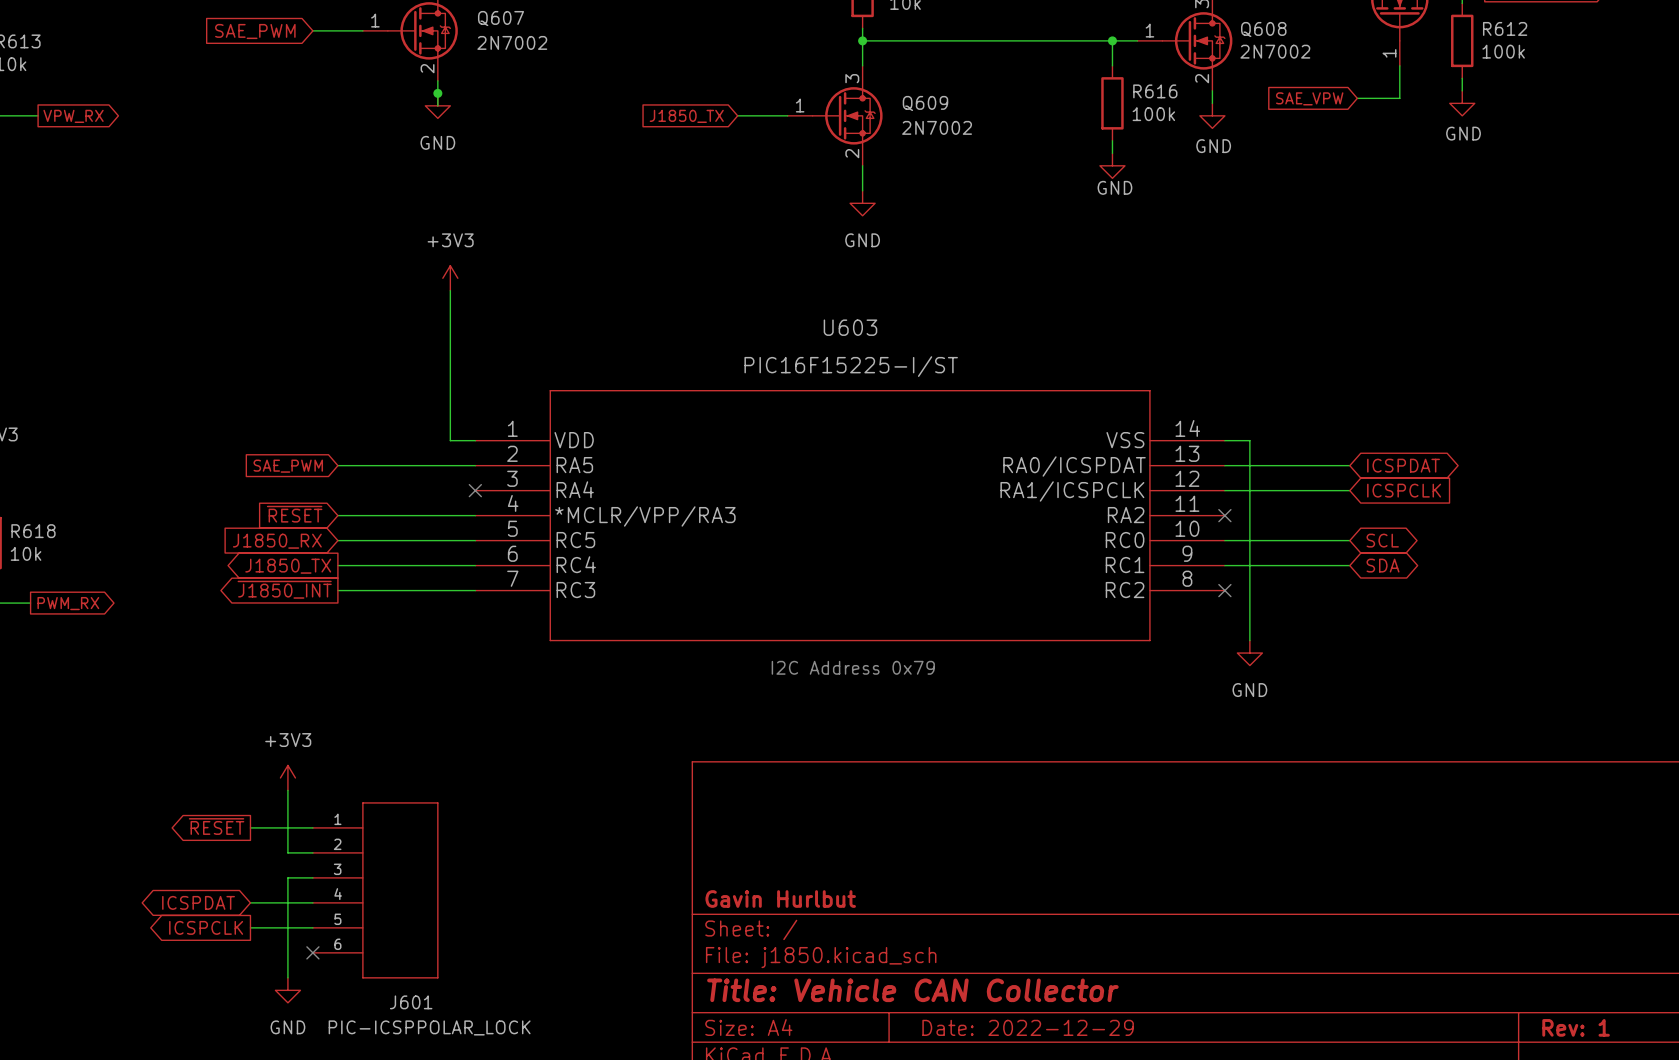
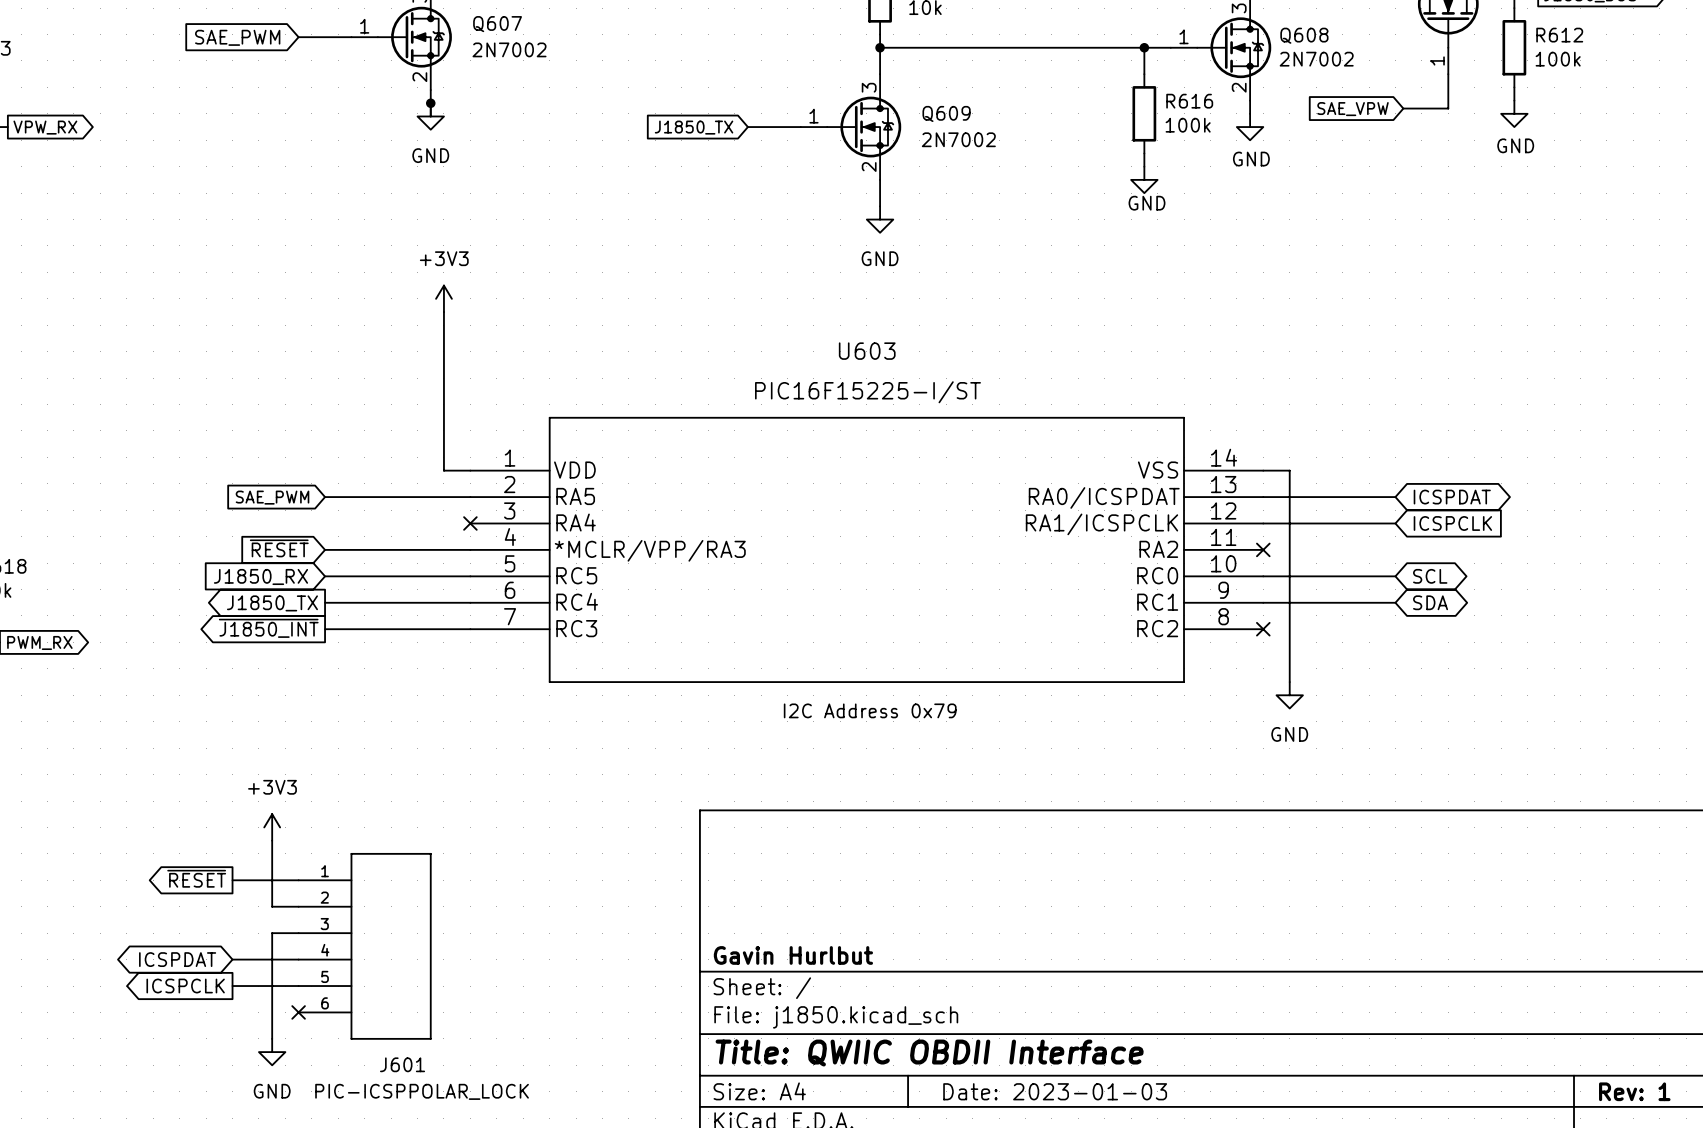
title block: Title: Vehicle CAN Collector (912, 990) -> Title: QWIIC OBDII Interface (929, 1053)
title block: Date: 2022-12-29 (1028, 1027) -> Date: 2023-01-03 (1055, 1091)

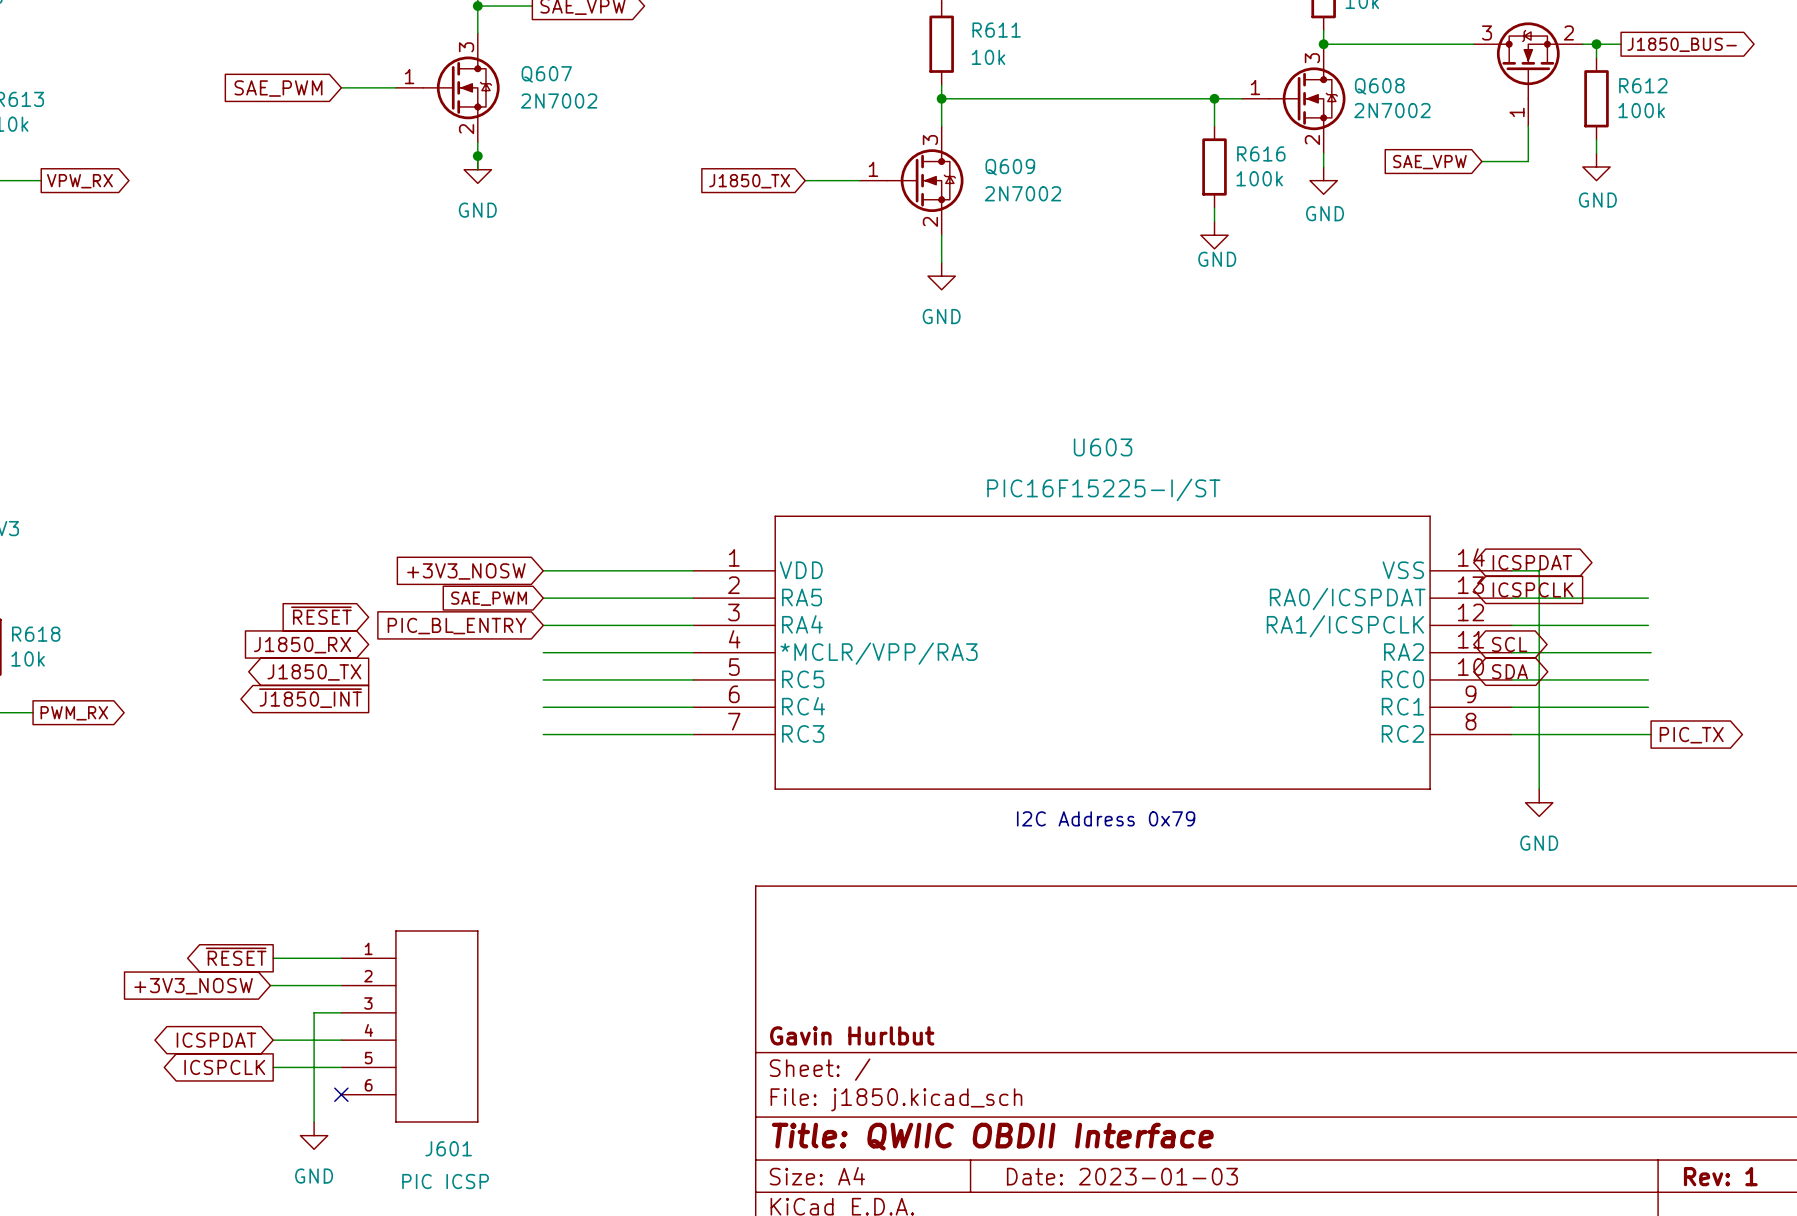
power symbol: +3V3 (443, 298) -> none
wire: (443, 312) (443, 470) (470, 470) -> none
wire: (1263, 470) (1289, 470) (1289, 682) -> (1511, 570) (1539, 570) (1539, 789)
global label position: SAE_PWM (272, 497) -> SAE_PWM (489, 598)
wire: (325, 497) (470, 497) -> (543, 598) (693, 598)
wire: (1263, 497) (1395, 497) -> (1511, 598) (1648, 598)
wire: none -> (543, 570) (693, 570)
global label: none -> +3V3_NOSW (466, 571)
no-connect mark: (470, 523) -> none
wire: (1263, 523) (1395, 523) -> (1511, 625) (1648, 625)
wire: (325, 549) (470, 549) -> (543, 652) (693, 652)
U603 position: (866, 549) -> (1102, 652)
no-connect mark: (1263, 549) -> none
wire: none -> (543, 625) (693, 625)
global label: none -> PIC_BL_ENTRY (457, 626)
wire: (325, 576) (470, 576) -> (543, 679) (693, 679)
wire: (1263, 576) (1395, 576) -> (1511, 679) (1648, 679)
wire: none -> (1511, 652) (1651, 652)
wire: (325, 602) (470, 602) -> (543, 707) (693, 707)
wire: (1263, 602) (1395, 602) -> (1511, 707) (1648, 707)
wire: (325, 629) (470, 629) -> (543, 734) (693, 734)
no-connect mark: (1263, 629) -> none
wire: none -> (1511, 734) (1651, 734)
global label: none -> PIC_TX (1691, 735)
power symbol position: GND (1289, 695) -> GND (1539, 802)
text position: I2C Address 0x79 (870, 710) -> I2C Address 0x79 (1106, 818)
power symbol: +3V3 (272, 827) -> none
wire: (272, 840) (272, 906) -> (270, 985) (314, 985)
global label: none -> +3V3_NOSW (193, 986)
J601 value: PIC-ICSPPOLAR_LOCK (422, 1091) -> PIC ICSP (445, 1181)

